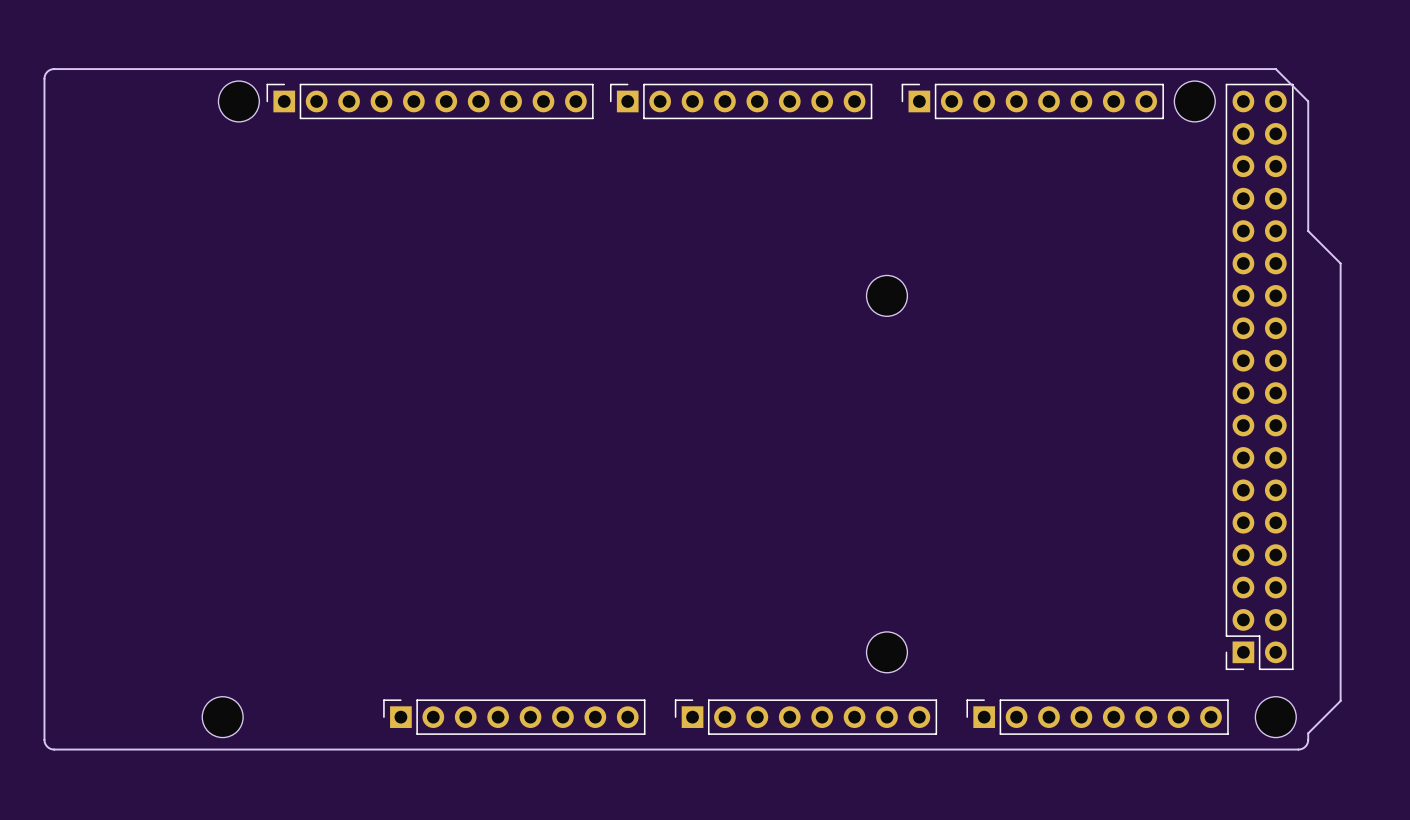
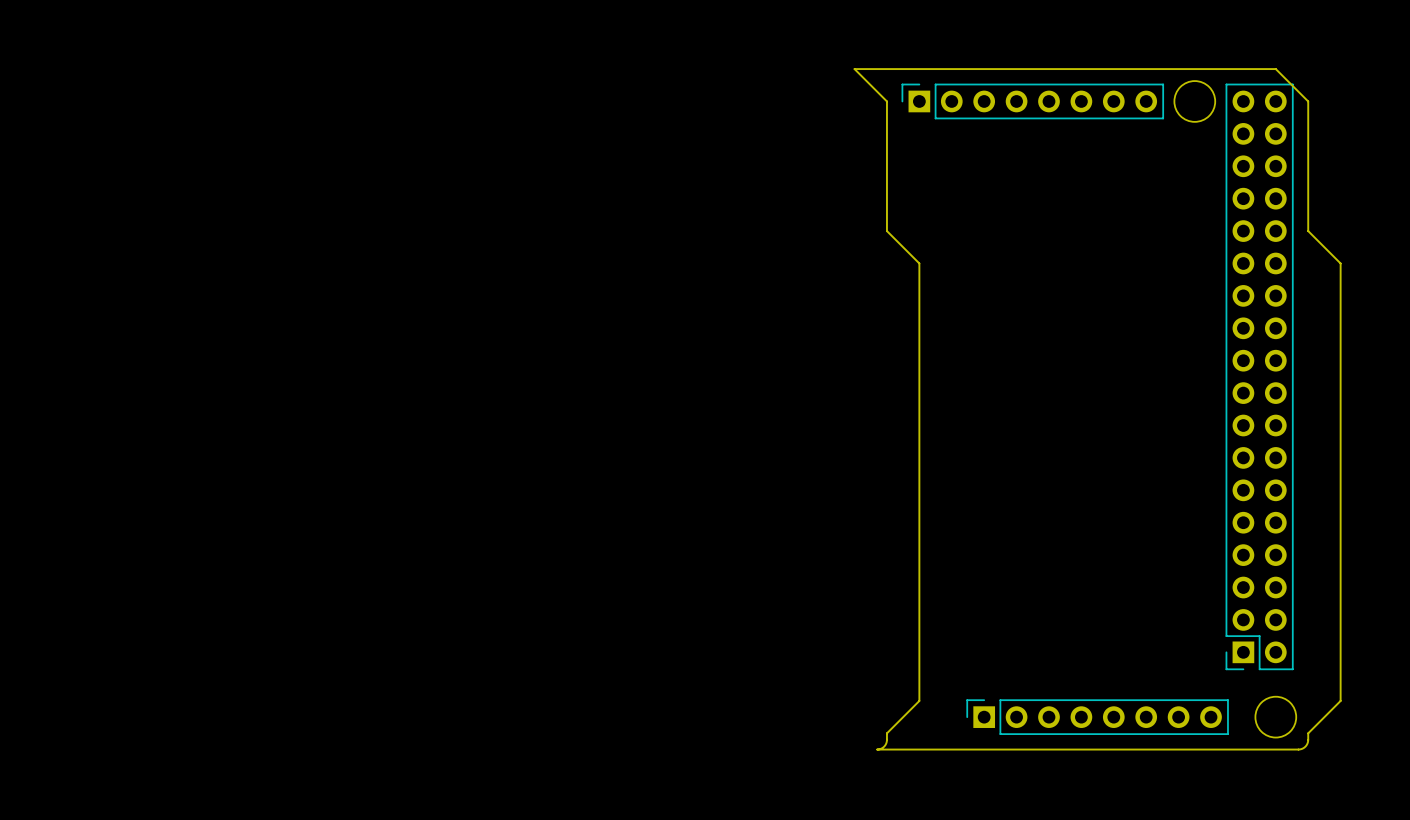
board edge: (854, 69) (54, 69) (48, 71) (44, 78) (44, 739) (47, 746) (54, 749) (877, 749) -> (854, 69) (886, 101) (886, 231) (919, 263) (919, 700) (886, 733) (884, 745) (877, 749)
part: (238, 101) -> none
part: (430, 101) -> none
part: (741, 101) -> none
part: (886, 295) -> none
part: (886, 652) -> none
part: (222, 717) -> none
part: (514, 717) -> none
part: (805, 717) -> none

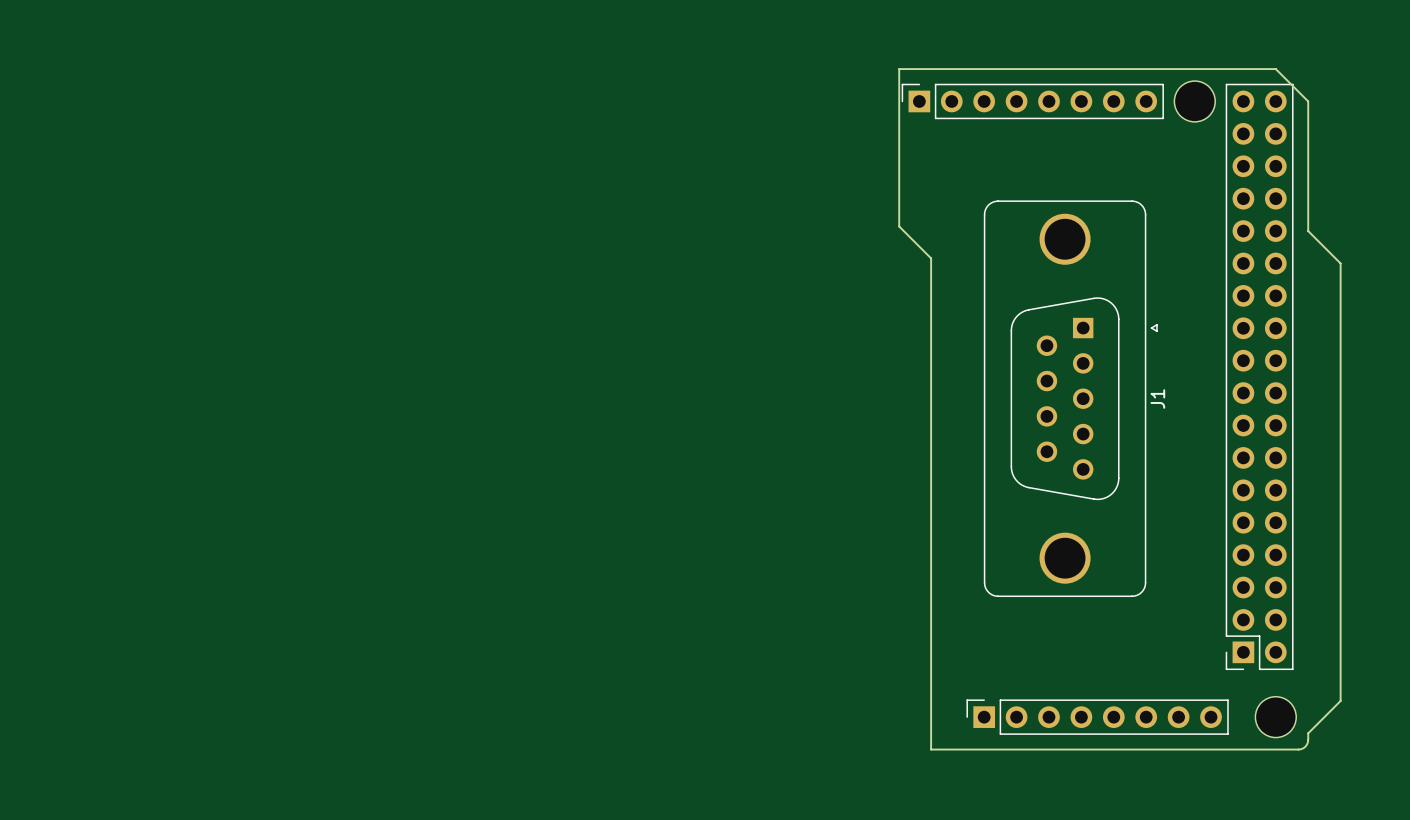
board edge: (899, 69) (854, 69) (886, 101) (886, 231) (919, 263) (919, 700) (886, 733) (884, 745) (877, 749) (931, 749) -> (899, 69) (899, 226) (931, 258) (931, 749)
J1: none -> (1070, 398)

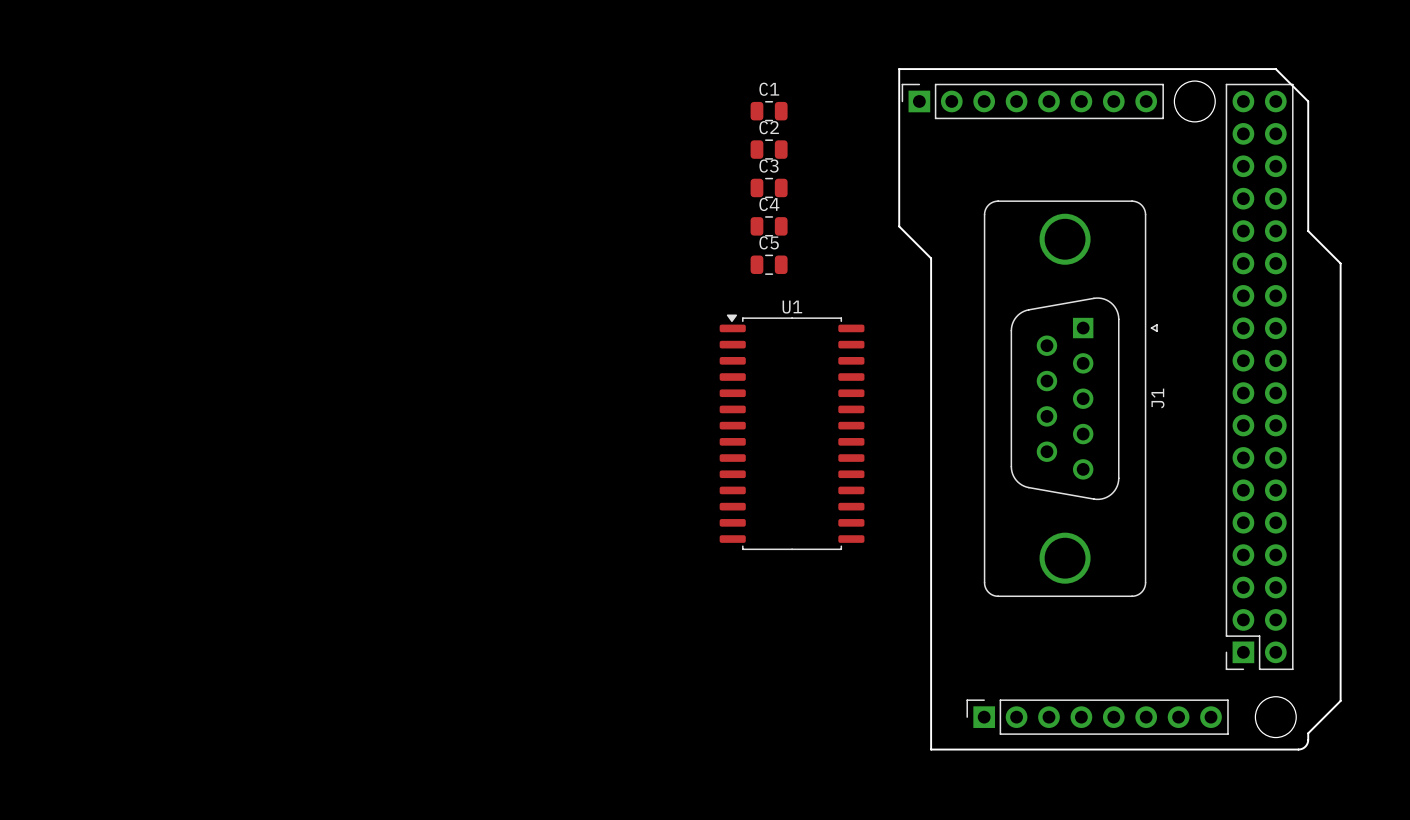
C1: none -> (769, 111)
C2: none -> (769, 149)
C3: none -> (769, 187)
C4: none -> (769, 226)
C5: none -> (769, 264)
U1: none -> (792, 432)

